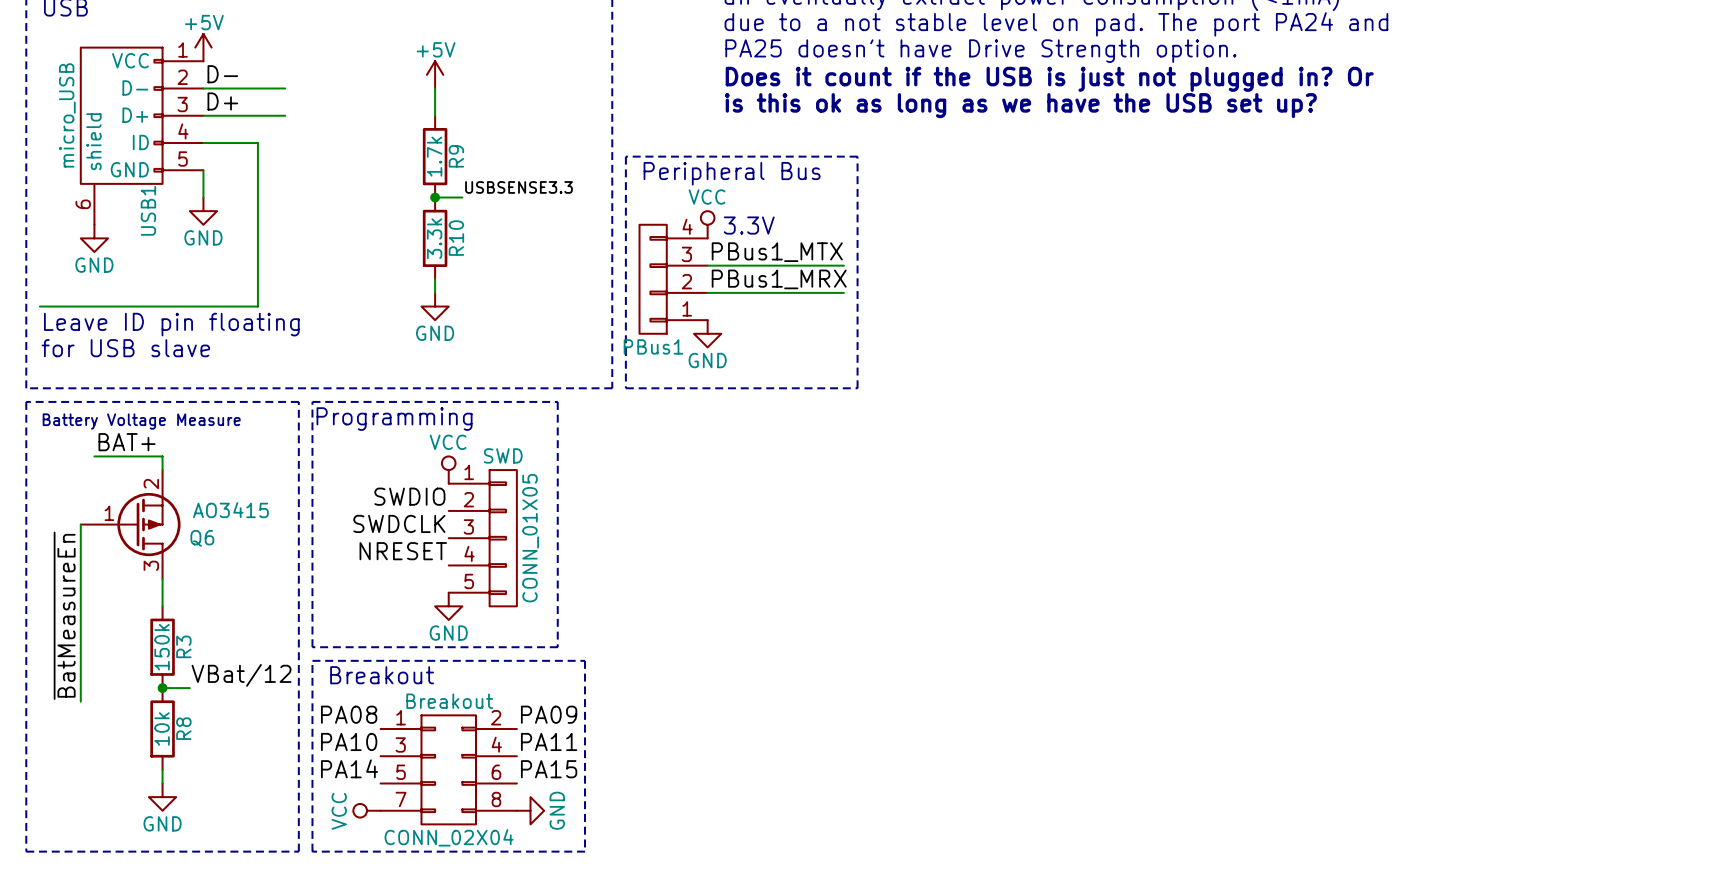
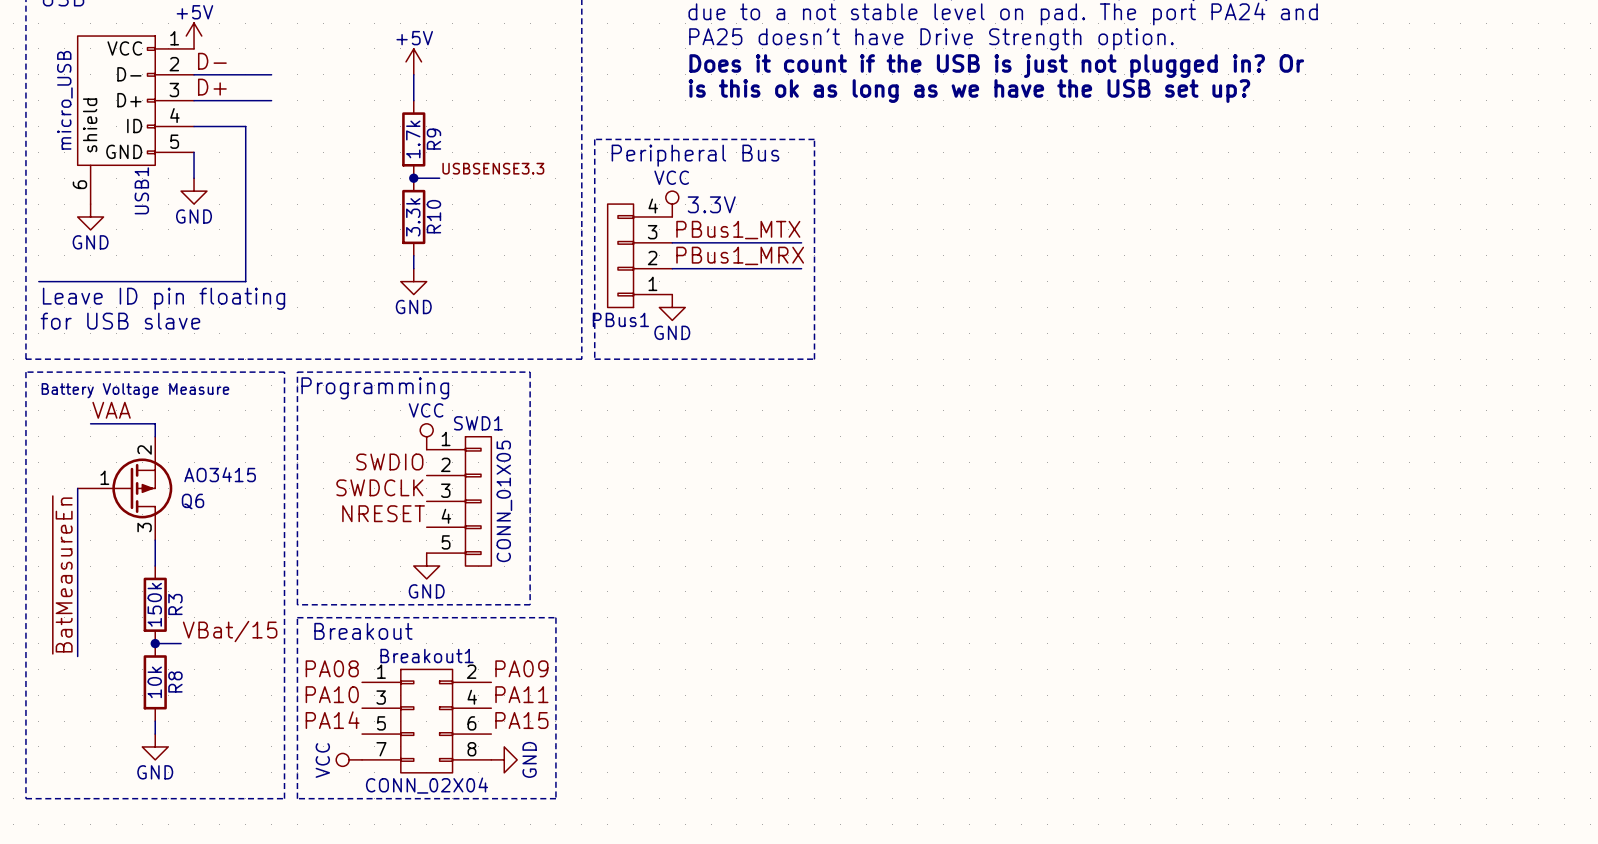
label: BAT+ (127, 442) -> VAA (111, 410)
SWD name: SWD (503, 455) -> SWD1 (478, 423)
label: VBat/12 (241, 675) -> VBat/15 (230, 631)
Breakout name: Breakout (449, 701) -> Breakout1 (427, 656)

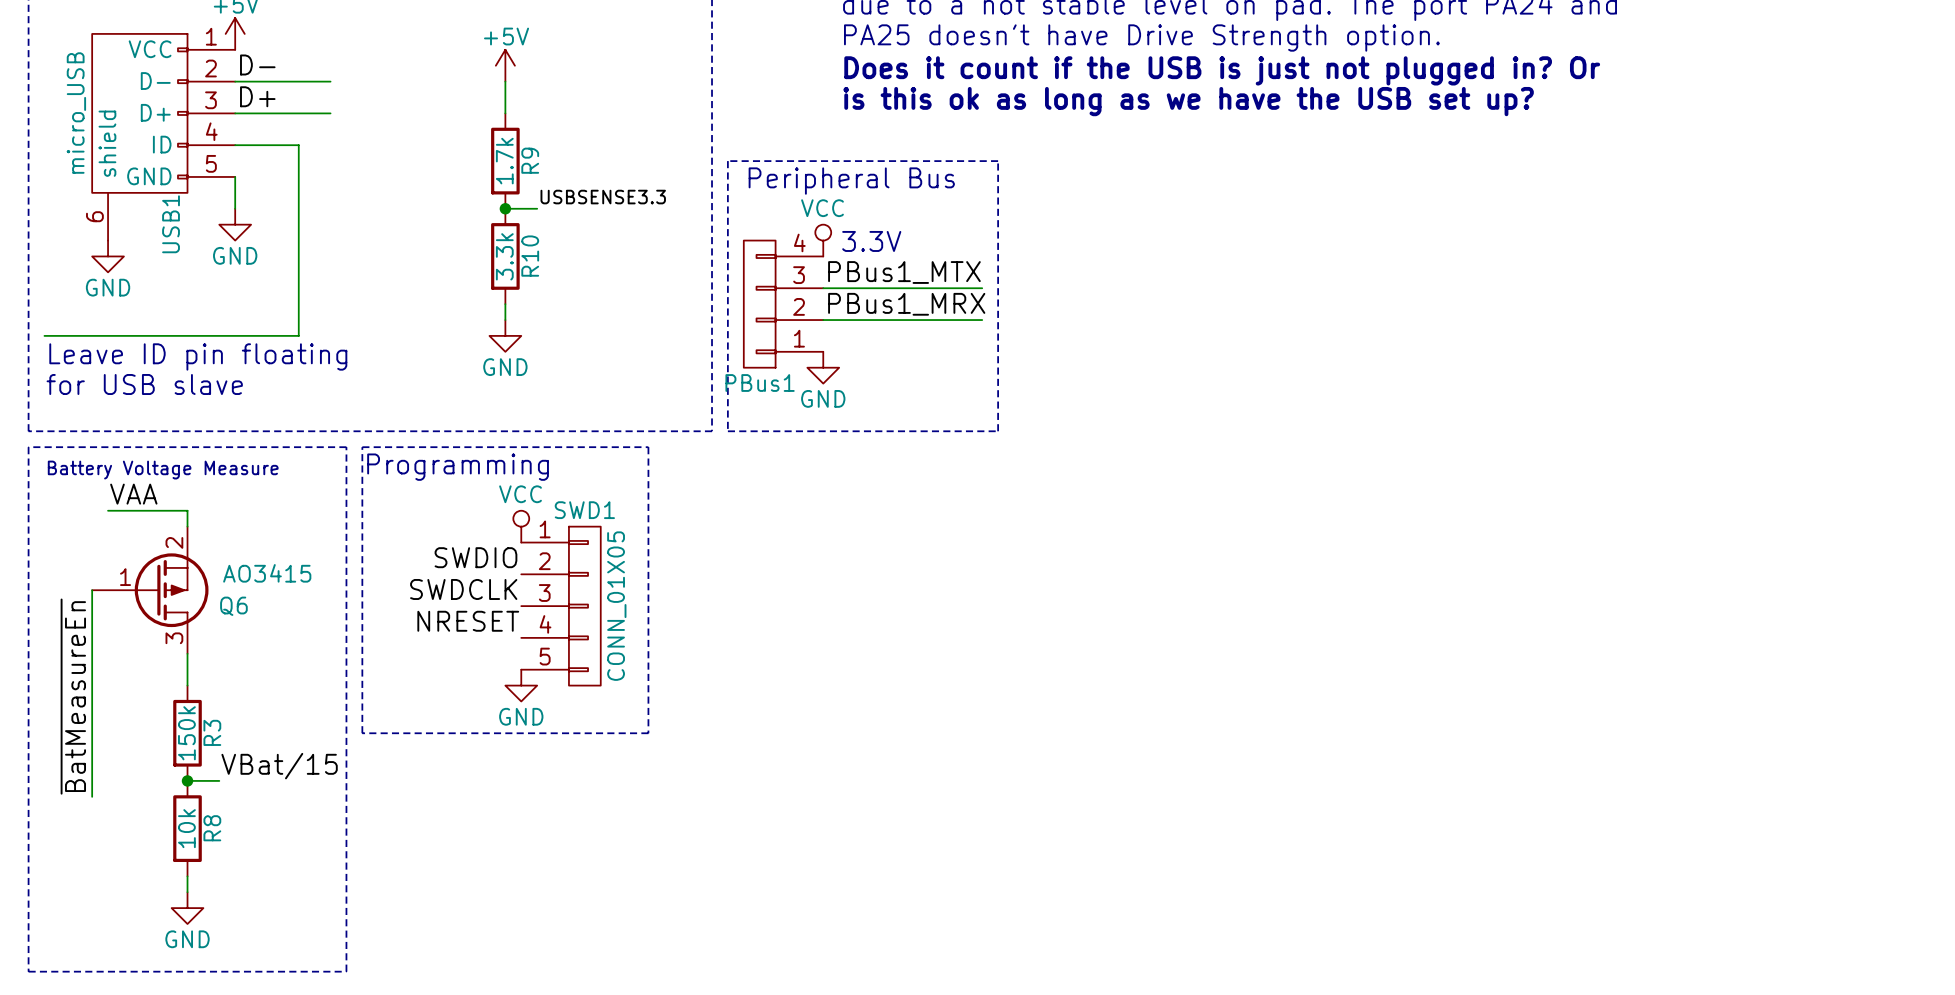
line: (297, 617) (555, 617) (555, 798) (297, 798) (297, 617) -> none
text: Breakout (363, 631) -> none
label: PA08 (332, 668) -> none
label: PA09 (521, 668) -> none
label: PA10 (332, 694) -> none
label: PA11 (521, 694) -> none
label: PA14 (332, 720) -> none
label: PA15 (521, 720) -> none
Breakout1: CONN_02X04 (426, 721) -> none
power symbol: VCC (349, 759) -> none
power symbol: GND (504, 759) -> none

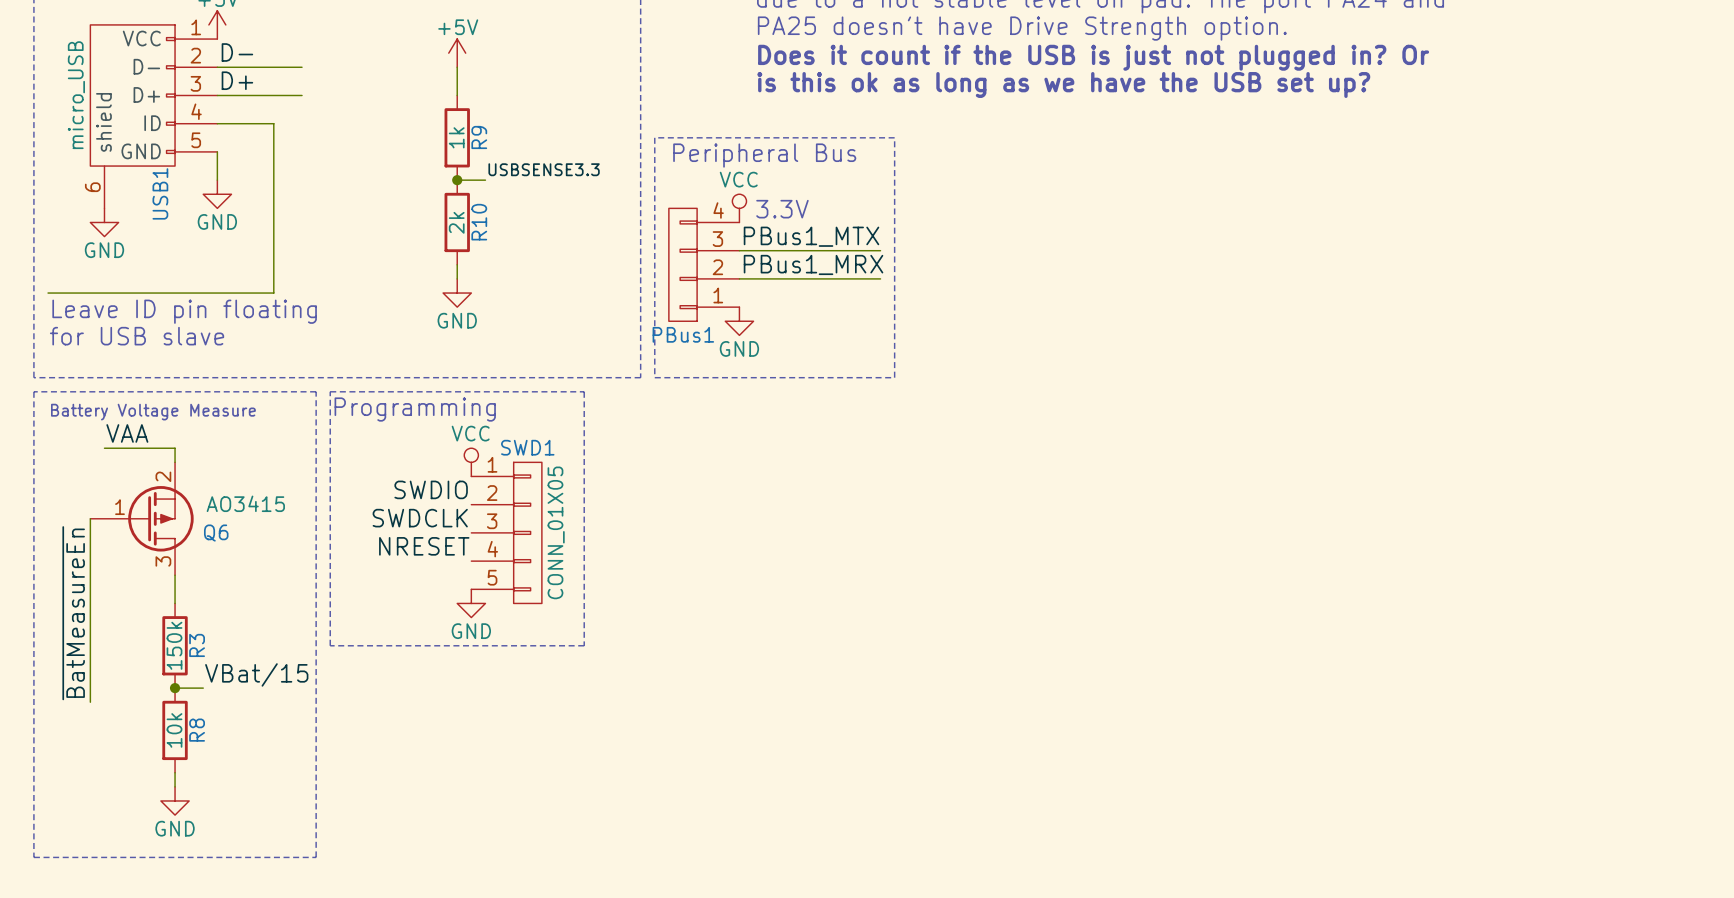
R9 value: 1.7k (504, 161) -> 1k (456, 137)
R10 value: 3.3k (504, 256) -> 2k (456, 222)

